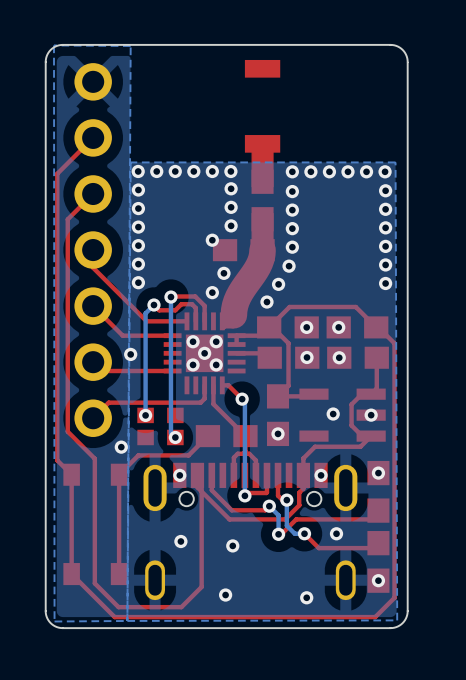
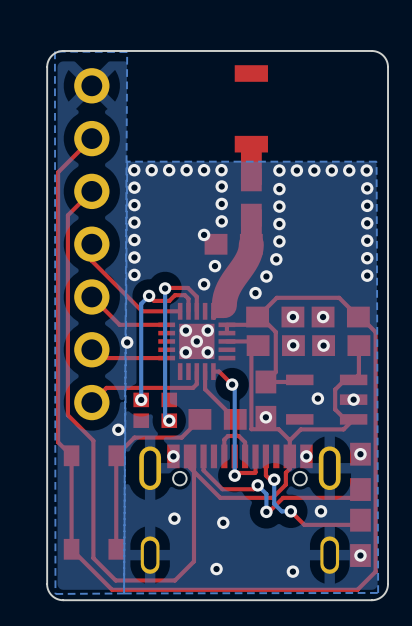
top track: none -> (258, 345) (251, 352) (251, 429) (278, 429) (289, 440)

